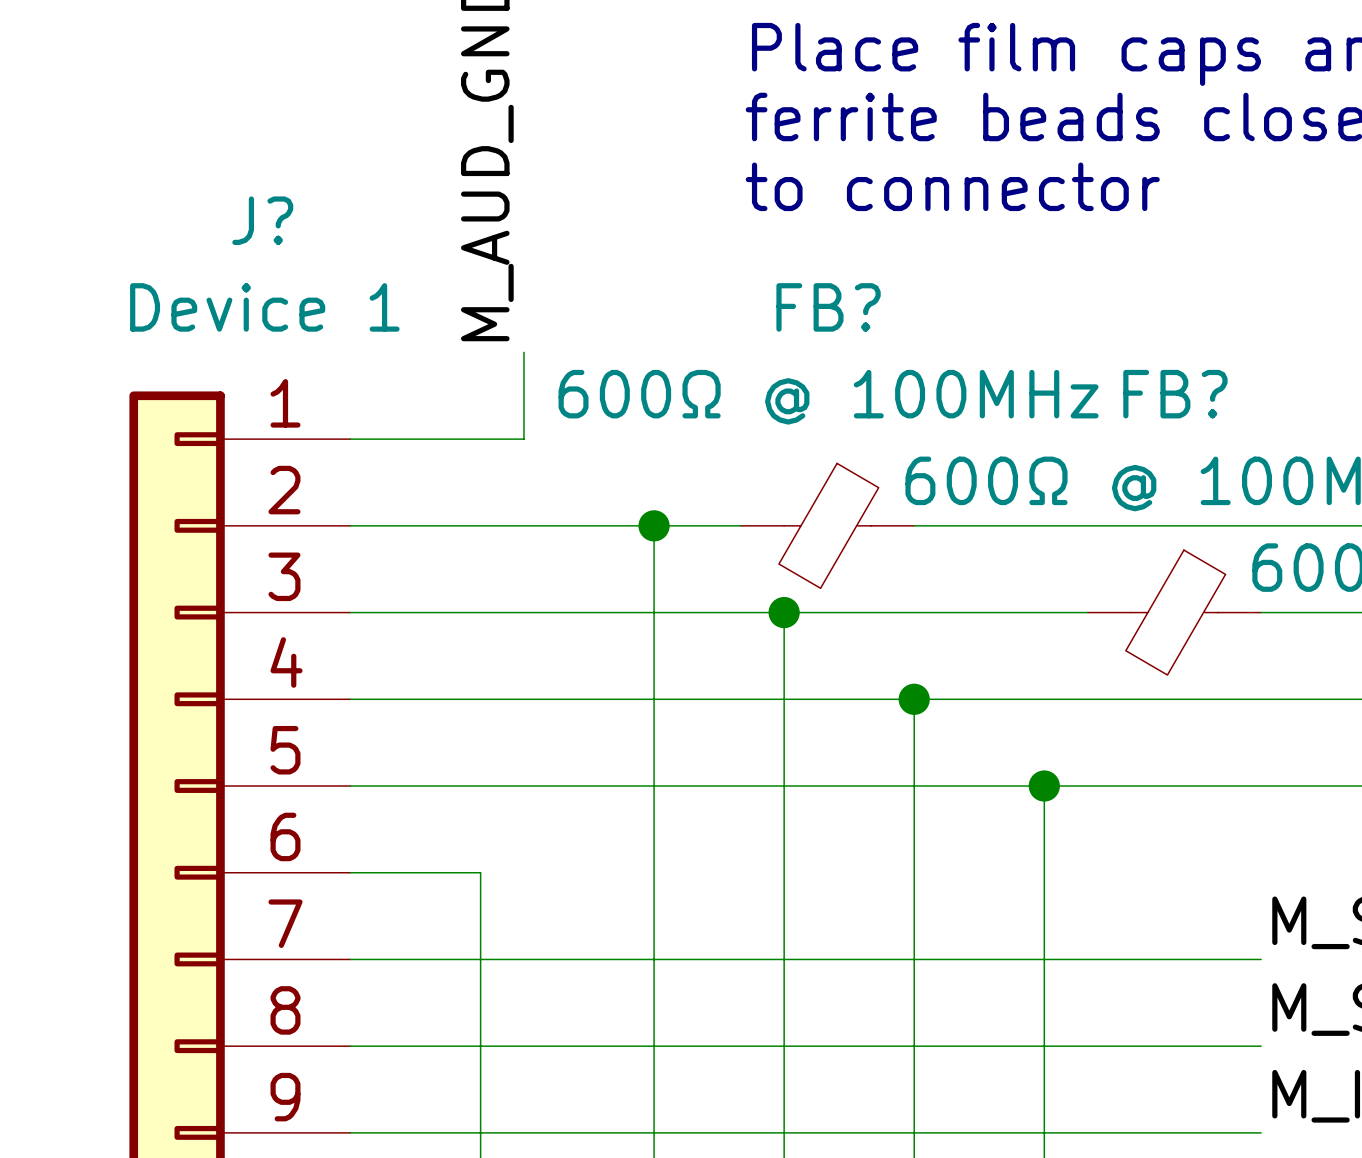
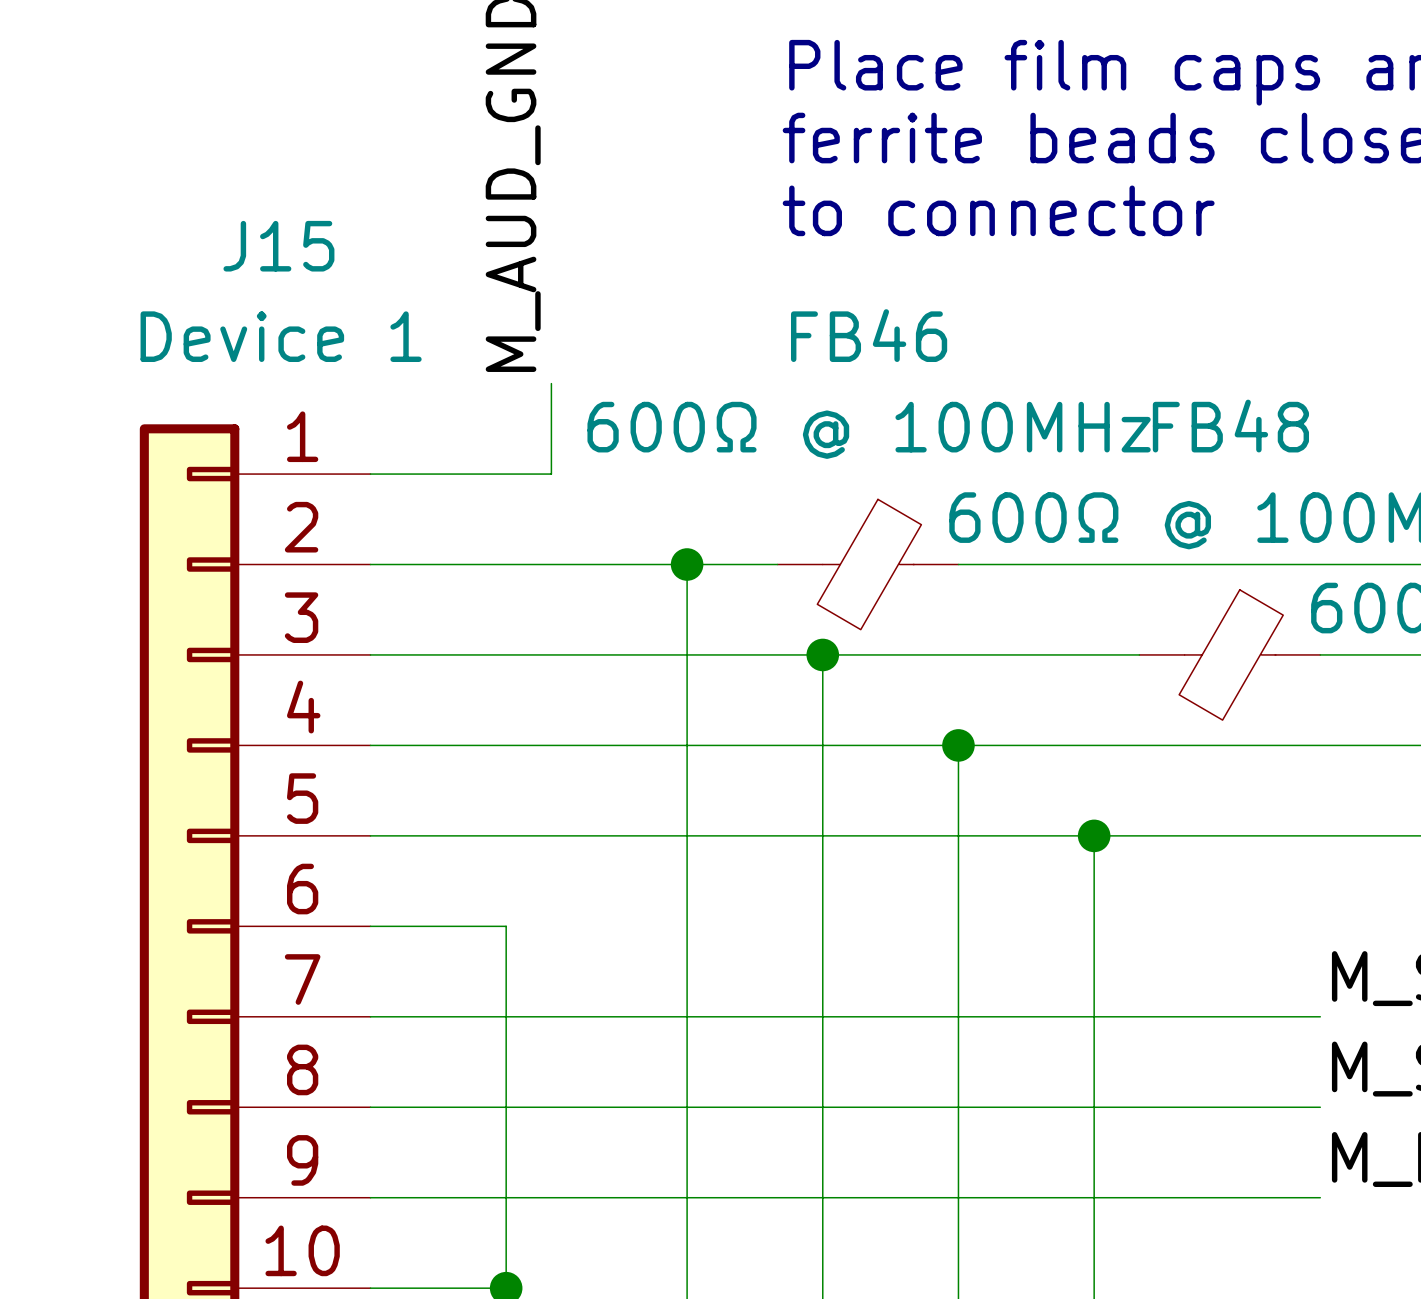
J? name: J? (262, 220) -> J15 (278, 246)
FB? name: FB? (828, 307) -> FB46 (869, 335)
FB? name: FB? (1175, 394) -> FB48 (1230, 426)

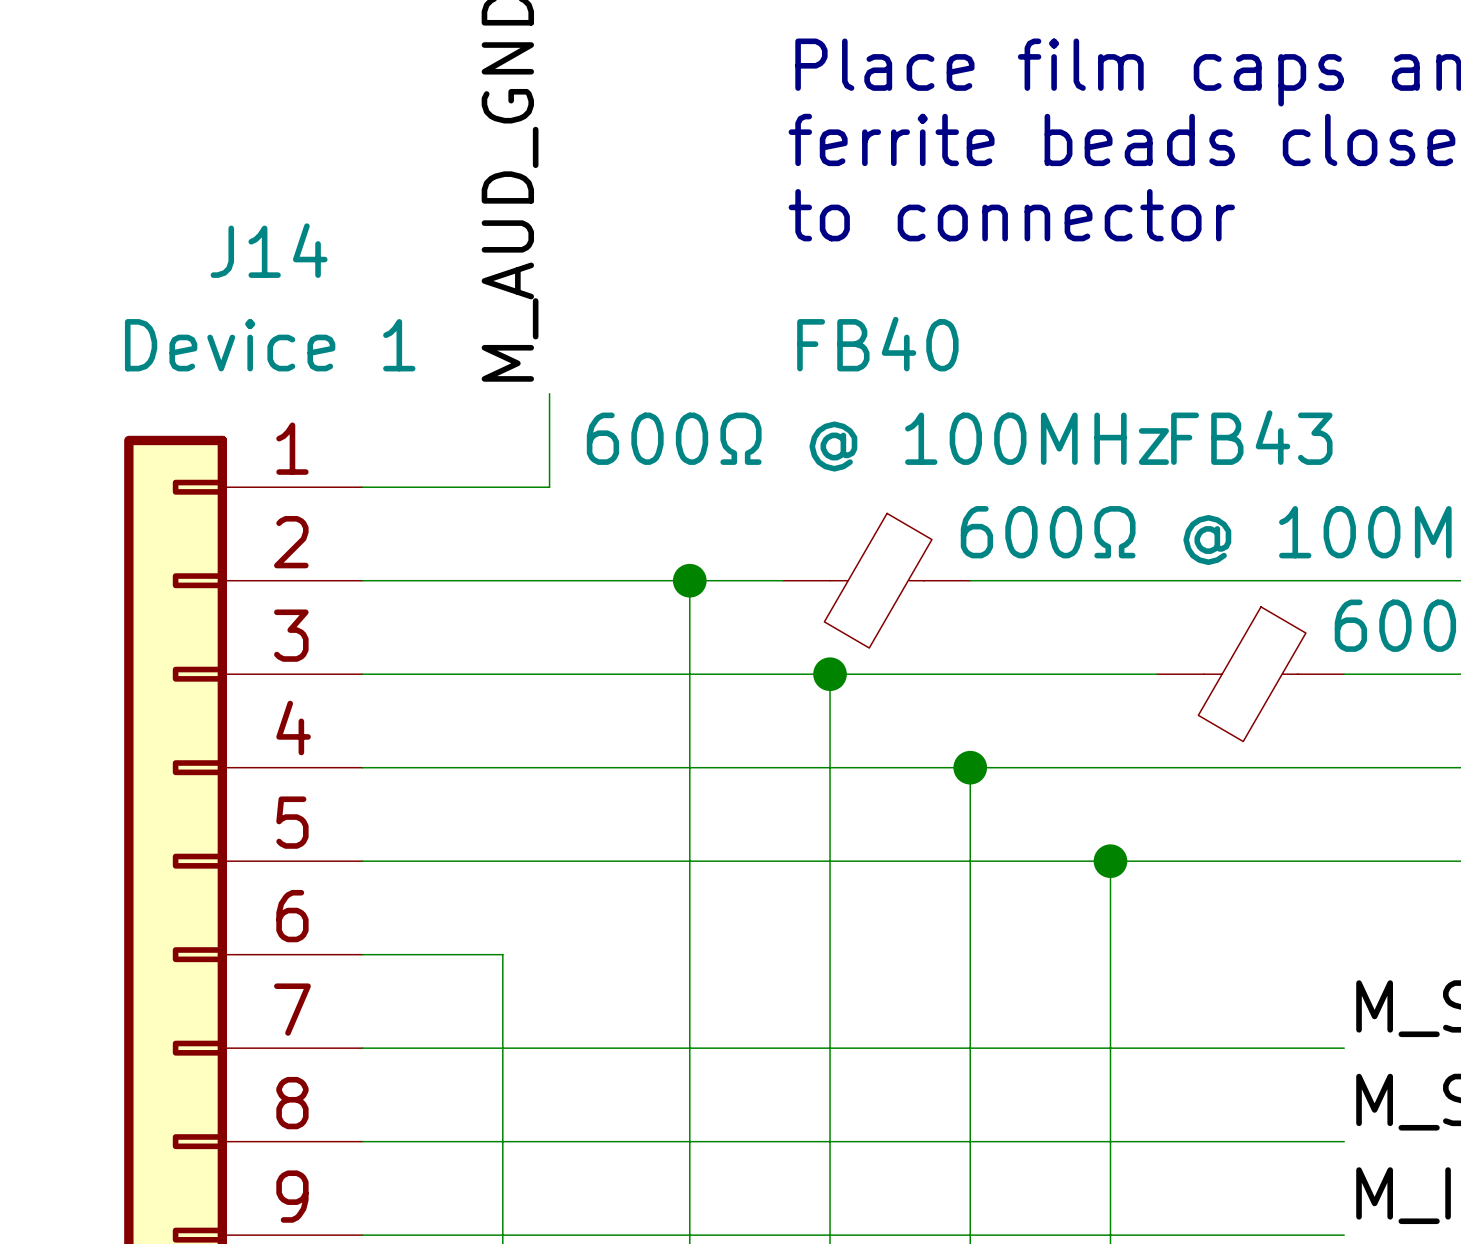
J15 name: J15 (278, 246) -> J14 (269, 250)
FB46 name: FB46 (869, 335) -> FB40 (877, 344)
FB48 name: FB48 (1230, 426) -> FB43 (1251, 437)

